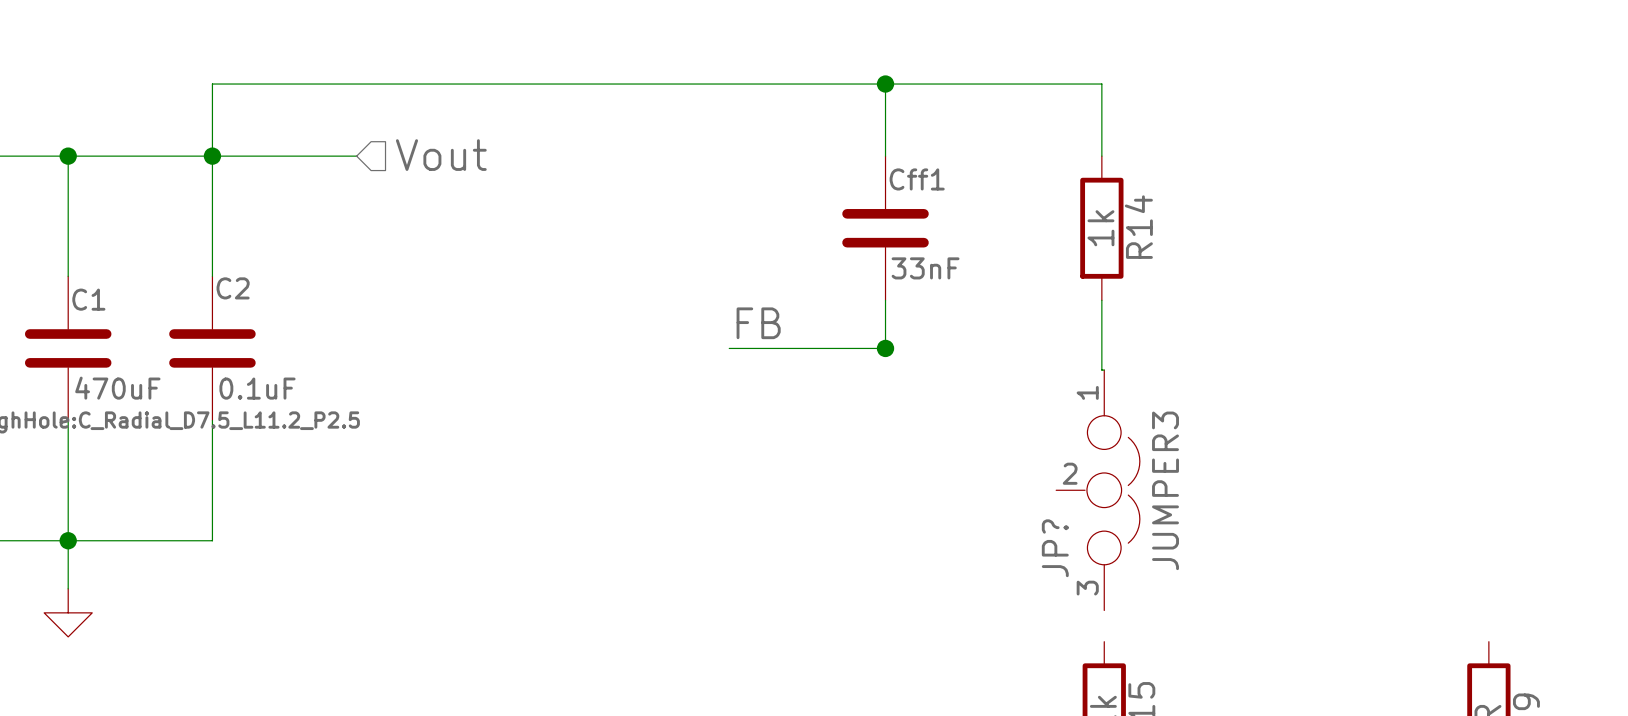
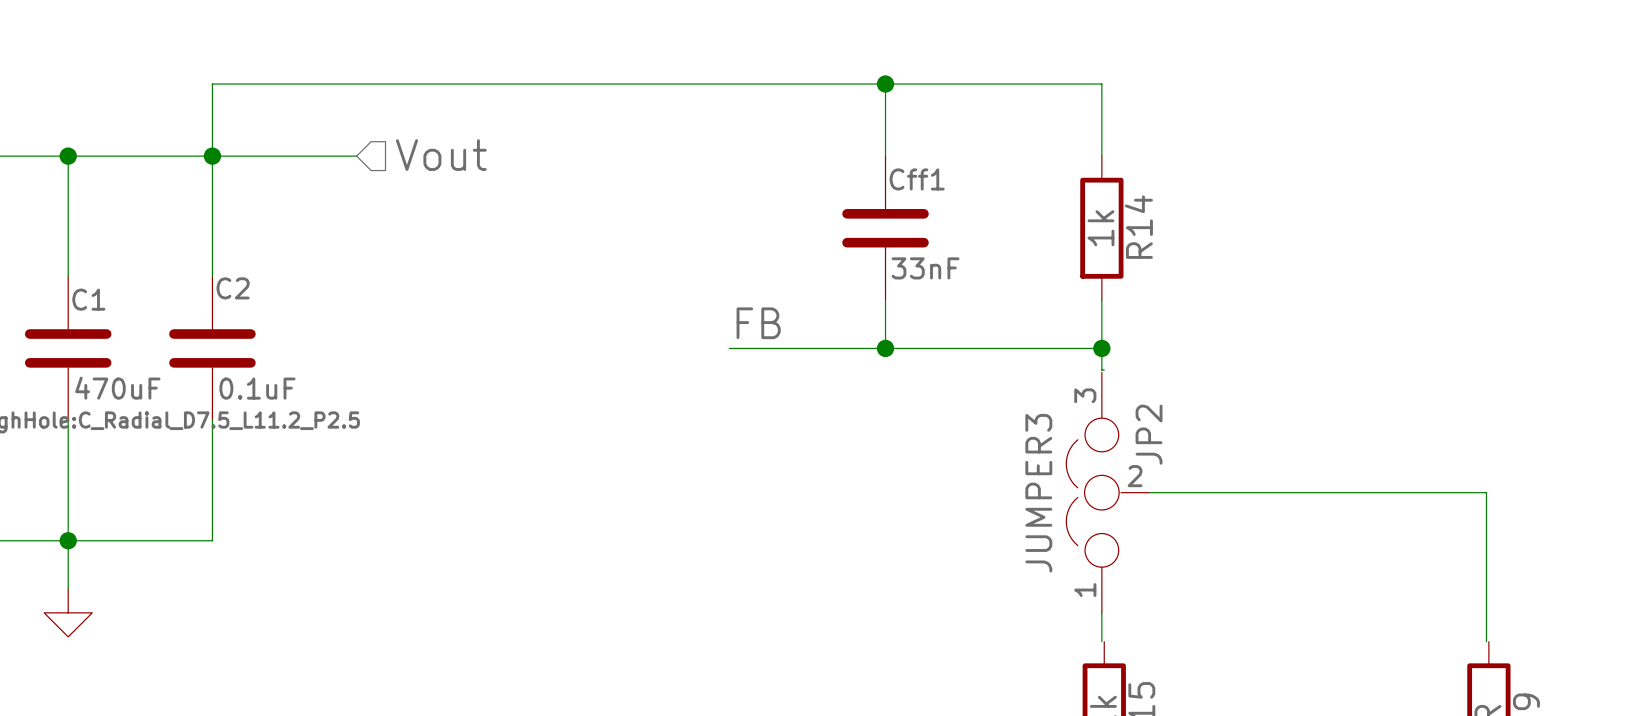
wire: none -> (885, 348) (1101, 348)
junction: none -> (1101, 348)
JP?: JUMPER3 (1098, 490) -> none
JP2: none -> JUMPER3 (1108, 492)
wire: none -> (1149, 492) (1486, 492) (1486, 641)
wire: none -> (1101, 612) (1101, 641)

